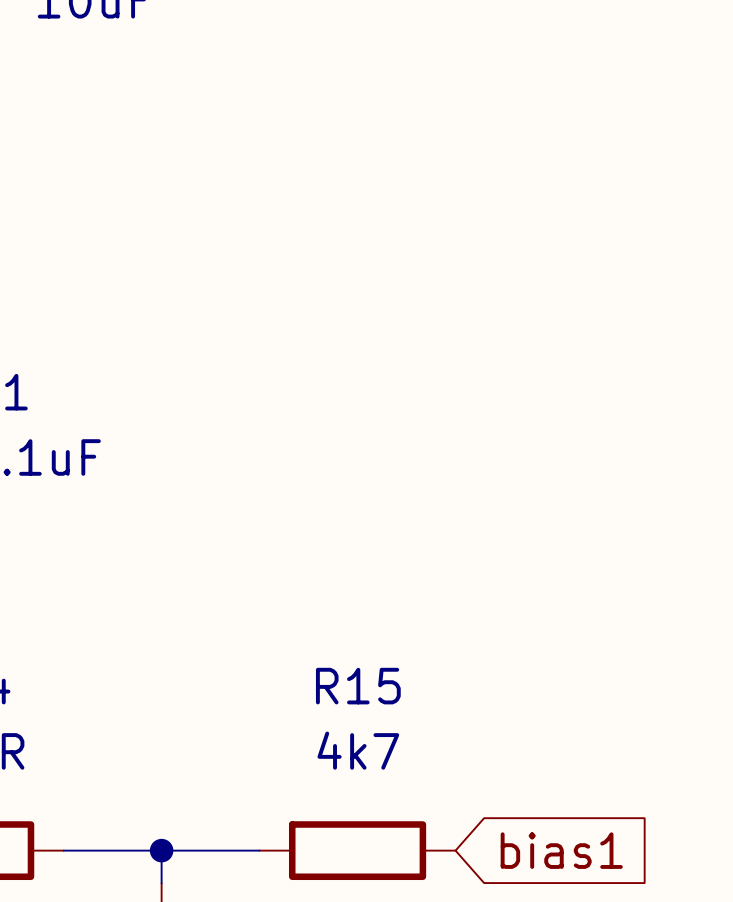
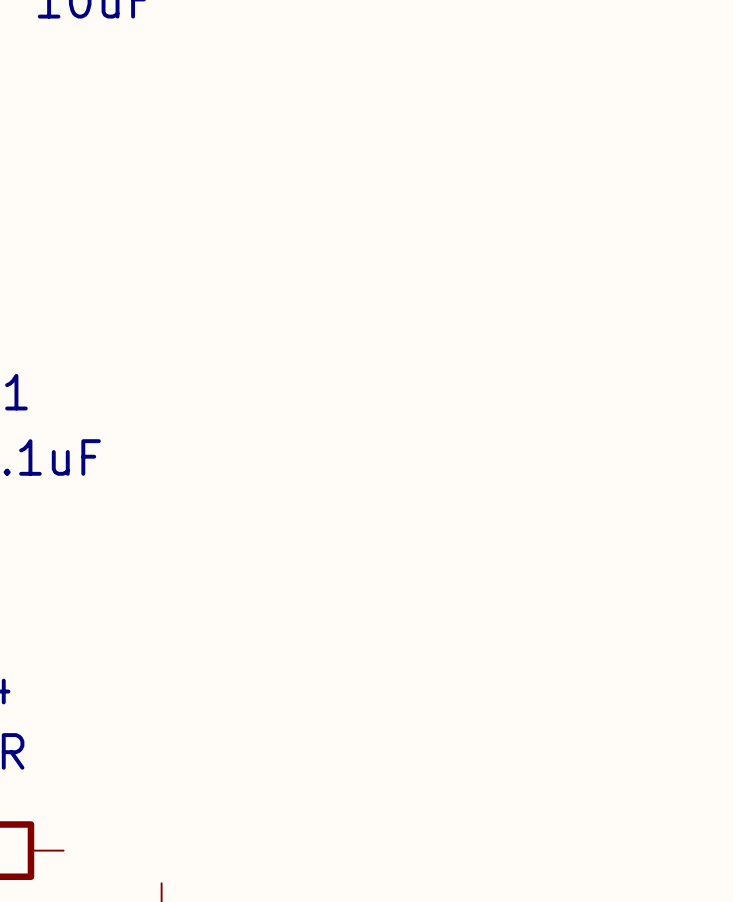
wire: (63, 850) (259, 850) -> none
wire: (161, 850) (161, 883) -> none
junction: (161, 850) -> none
R15: 4k7 (357, 850) -> none
global label: bias1 (561, 850) -> none

